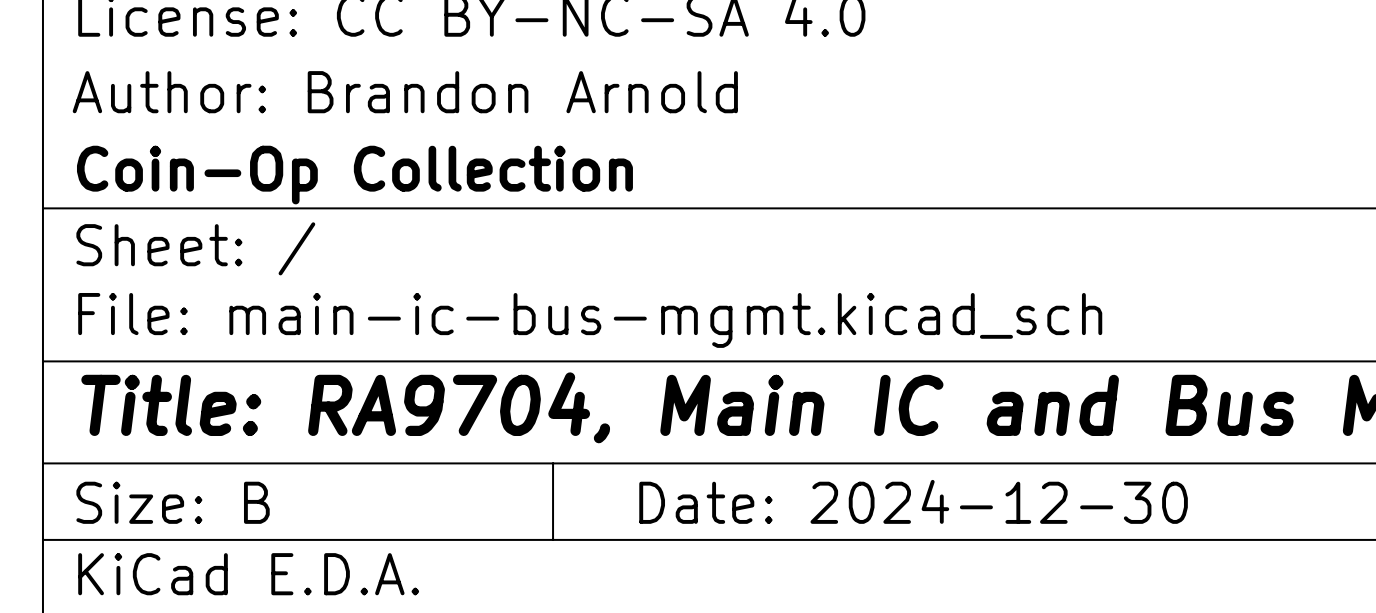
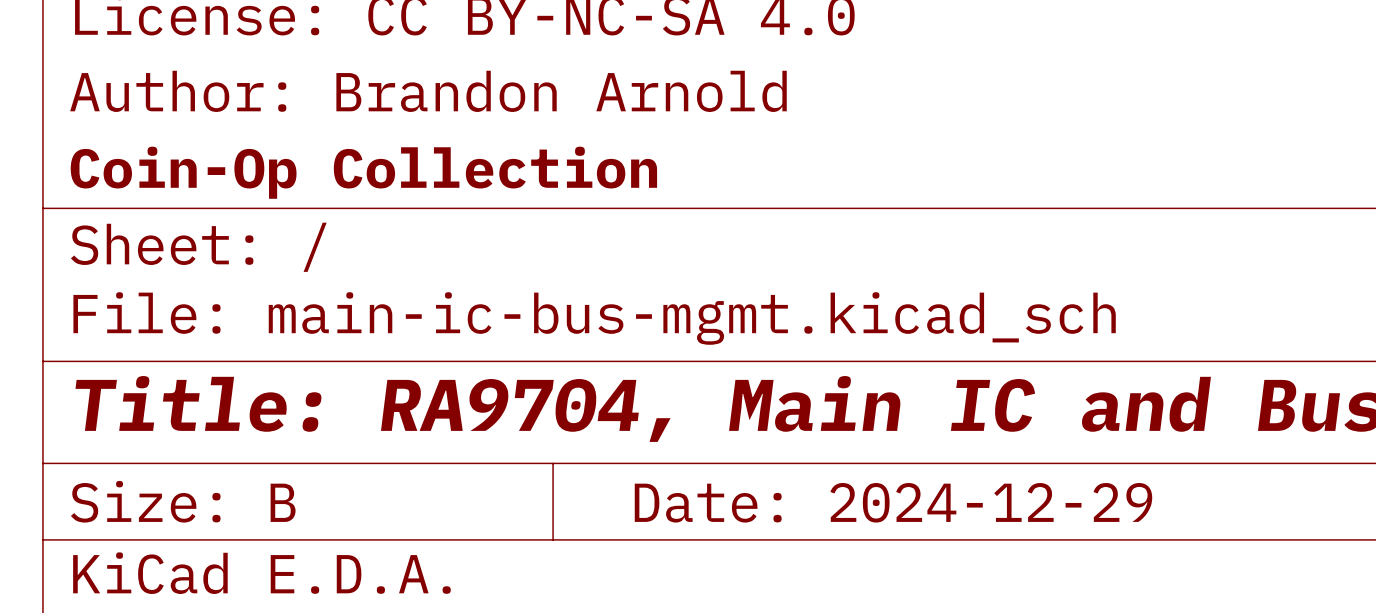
title block: Date: 2024-12-30 (913, 501) -> Date: 2024-12-29 (893, 502)

